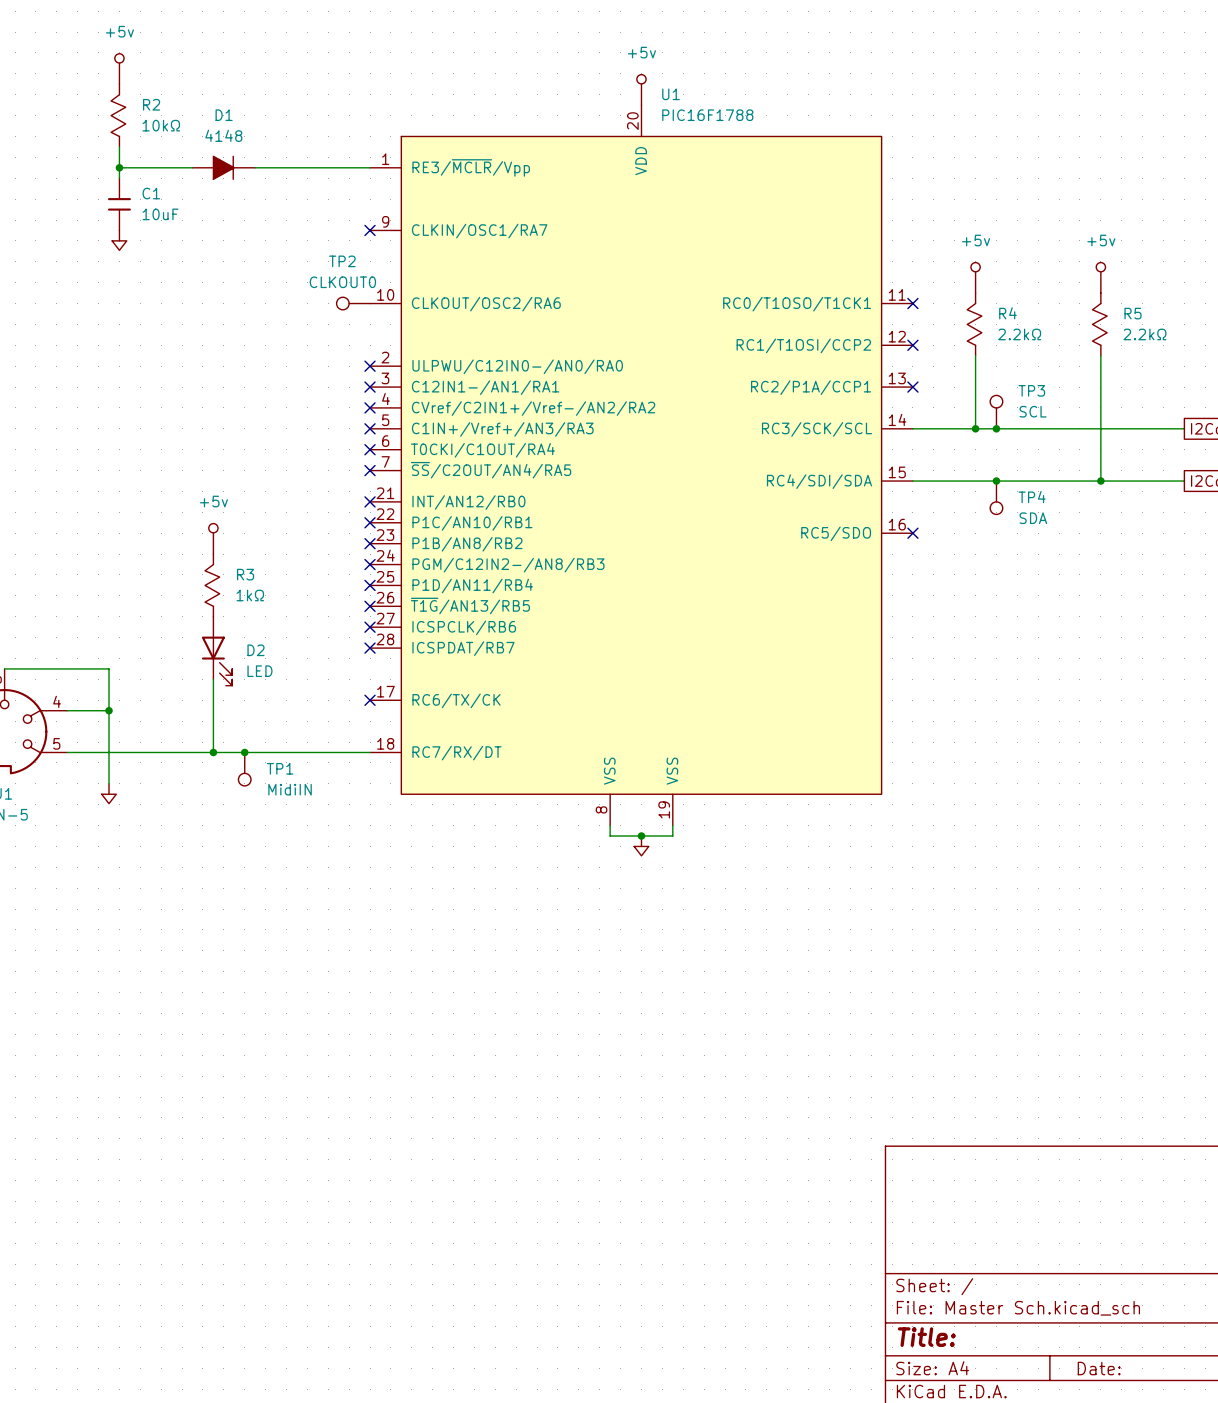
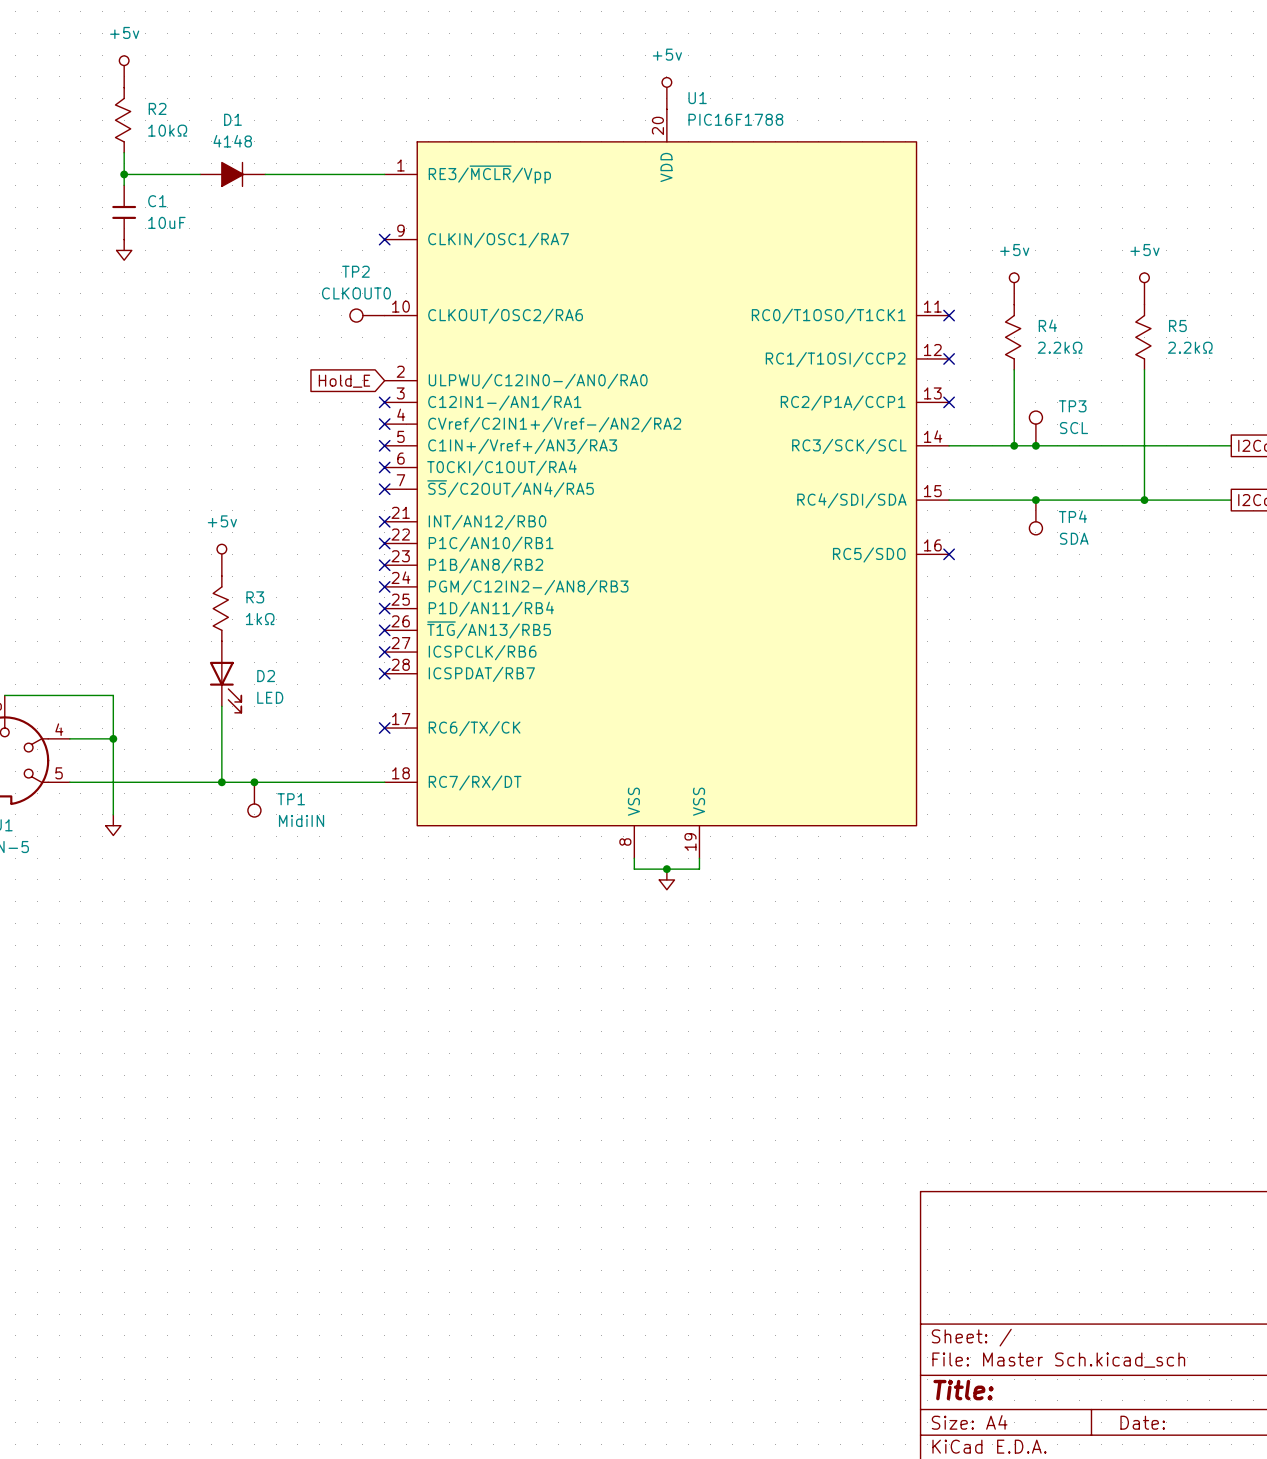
global label: none -> Hold_E (344, 381)
no-connect mark: (370, 366) -> none

